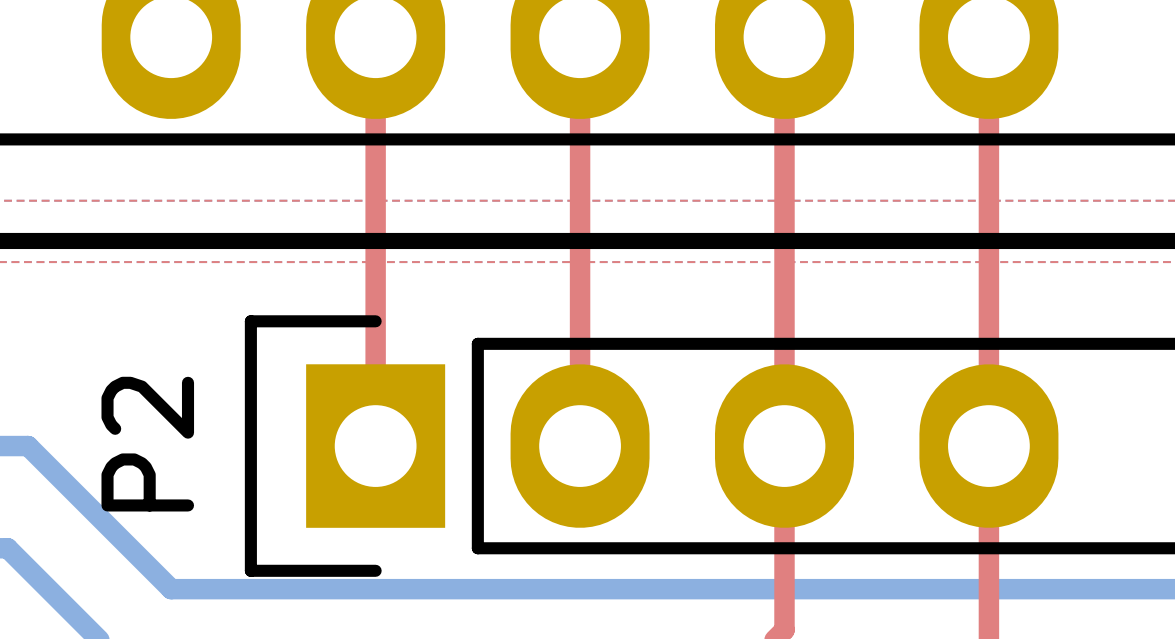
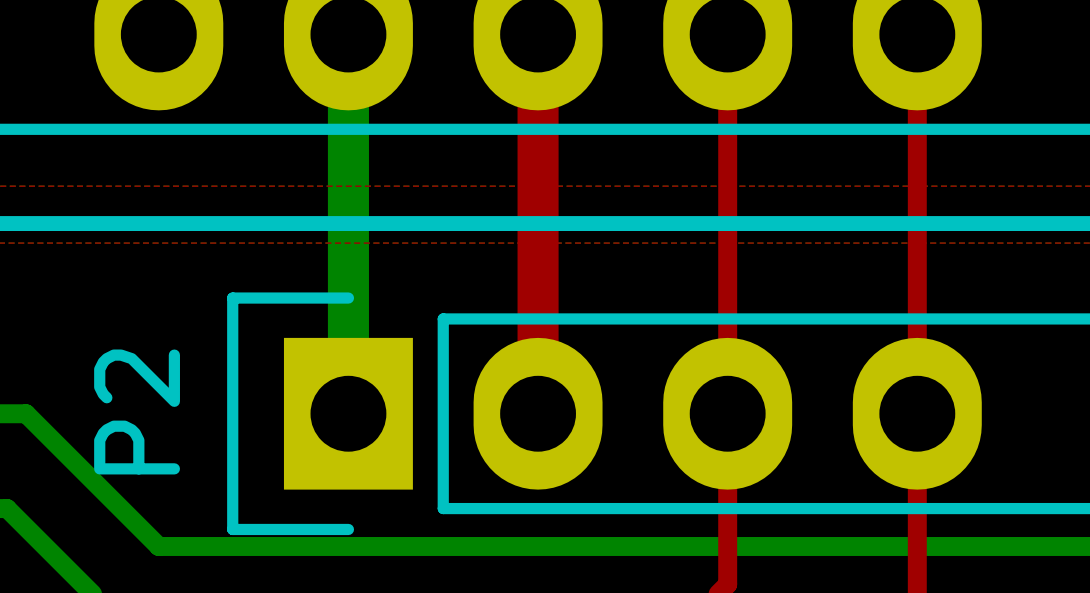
top track: (375, 37) (375, 446) -> none
bottom track: none -> (348, 34) (348, 413)
top track width: thin (580, 37) (580, 446) -> thick (538, 34) (538, 413)

